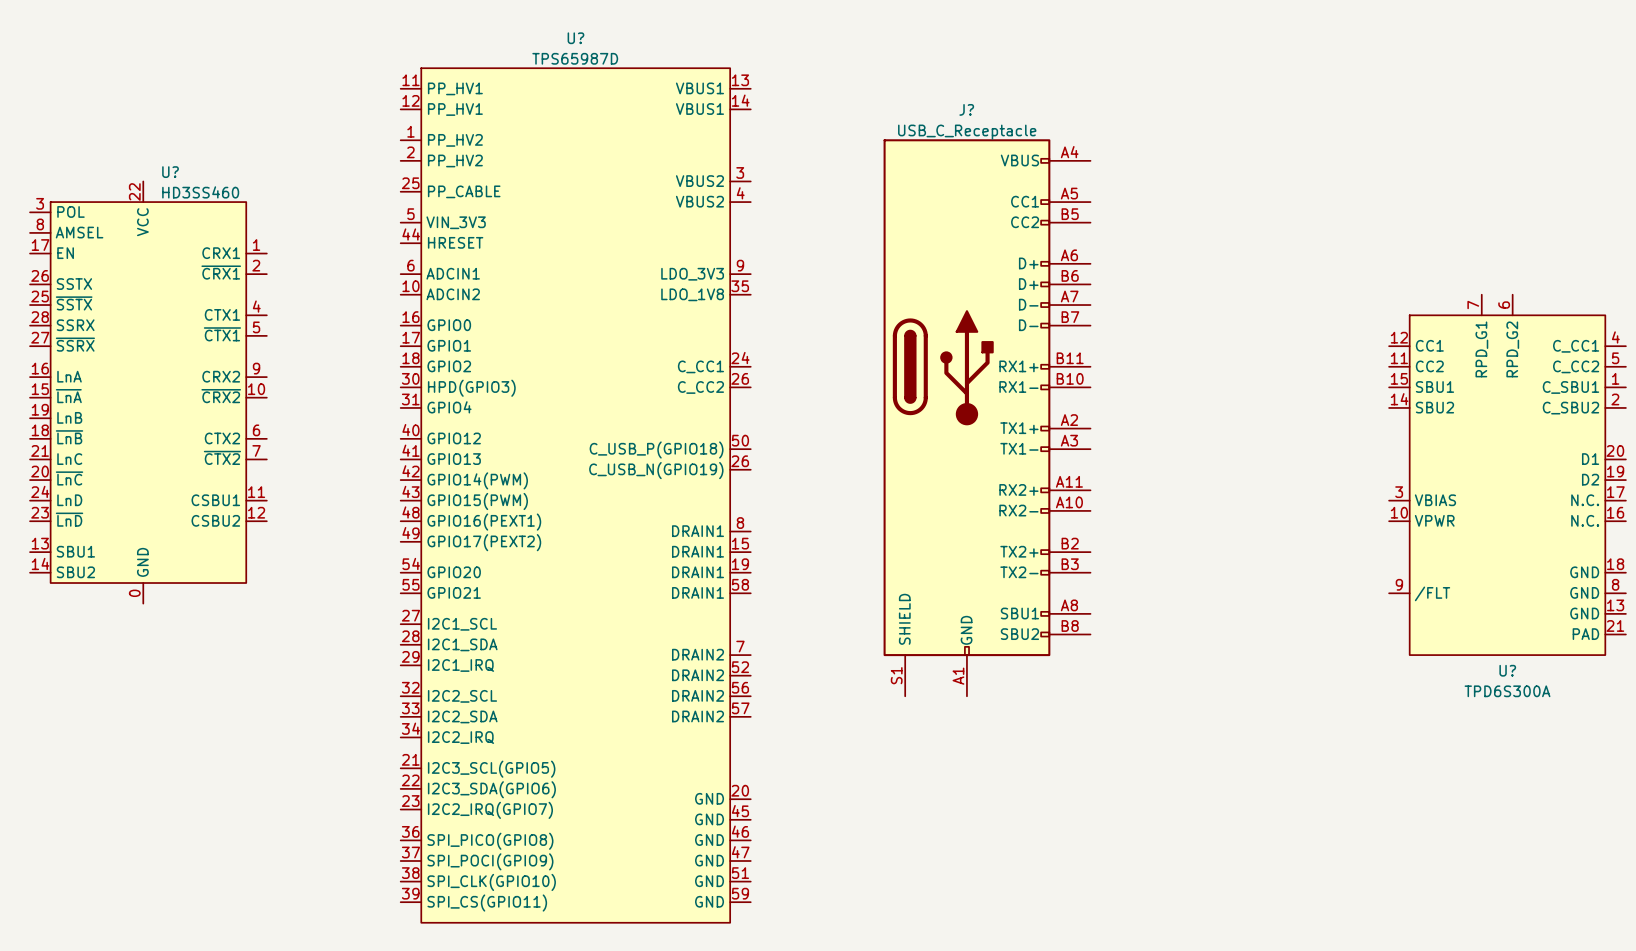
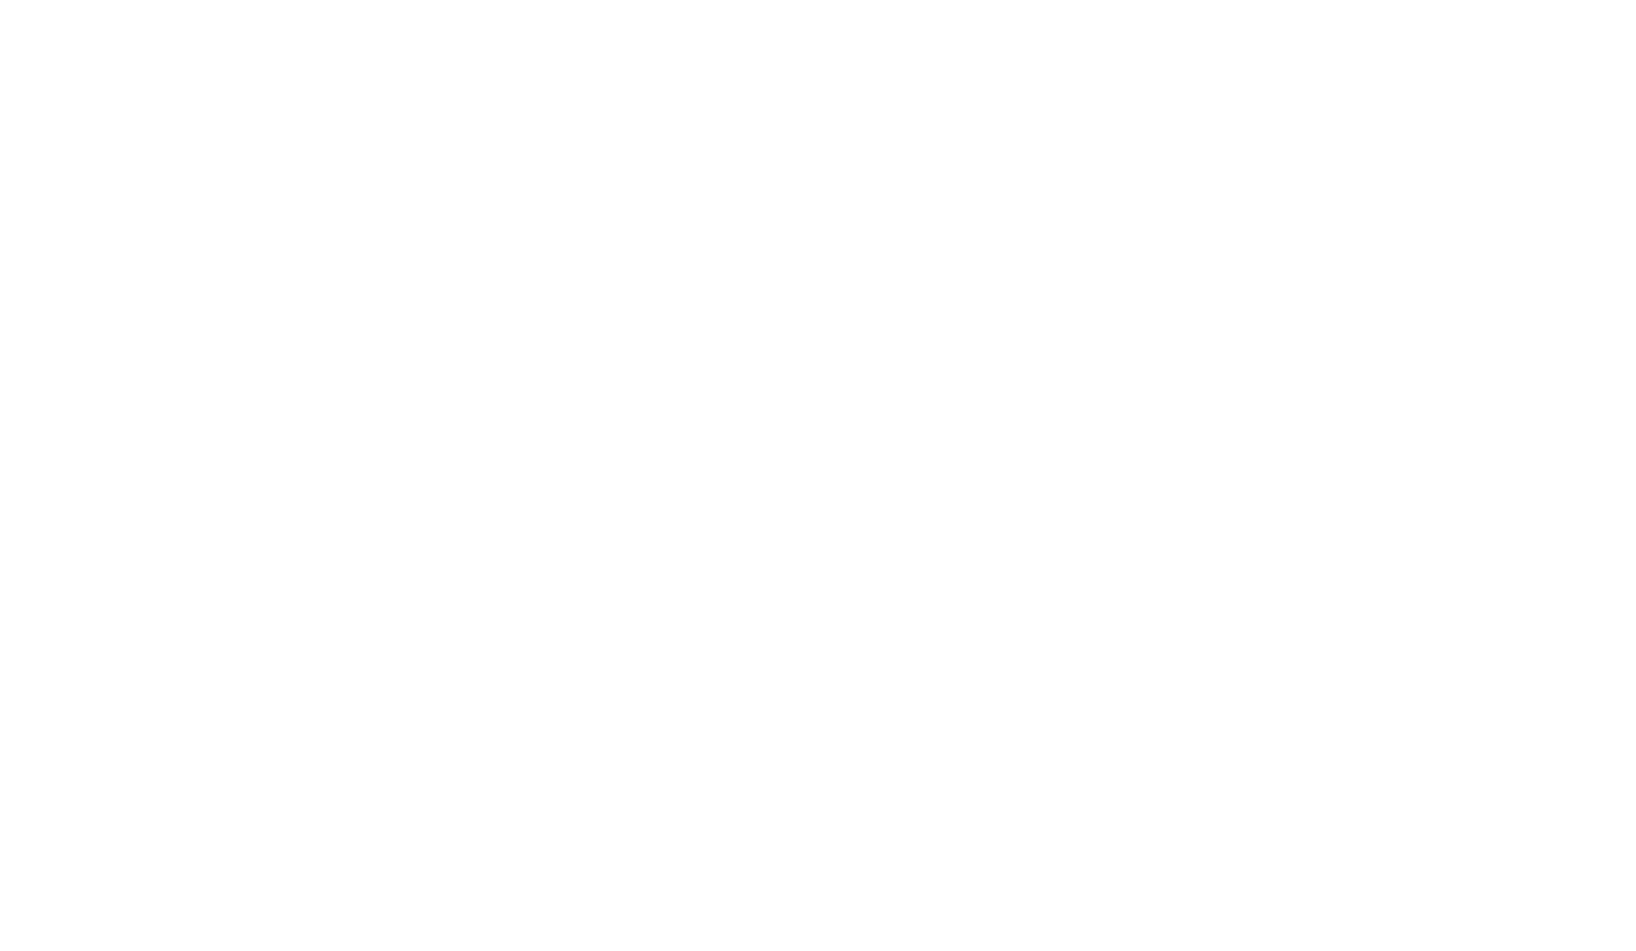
U?: HD3SS460 (148, 392) -> none
J?: USB_C_Receptacle (987, 417) -> none
U?: TPD6S300A (1507, 475) -> none
U?: TPS65987D (575, 495) -> none

